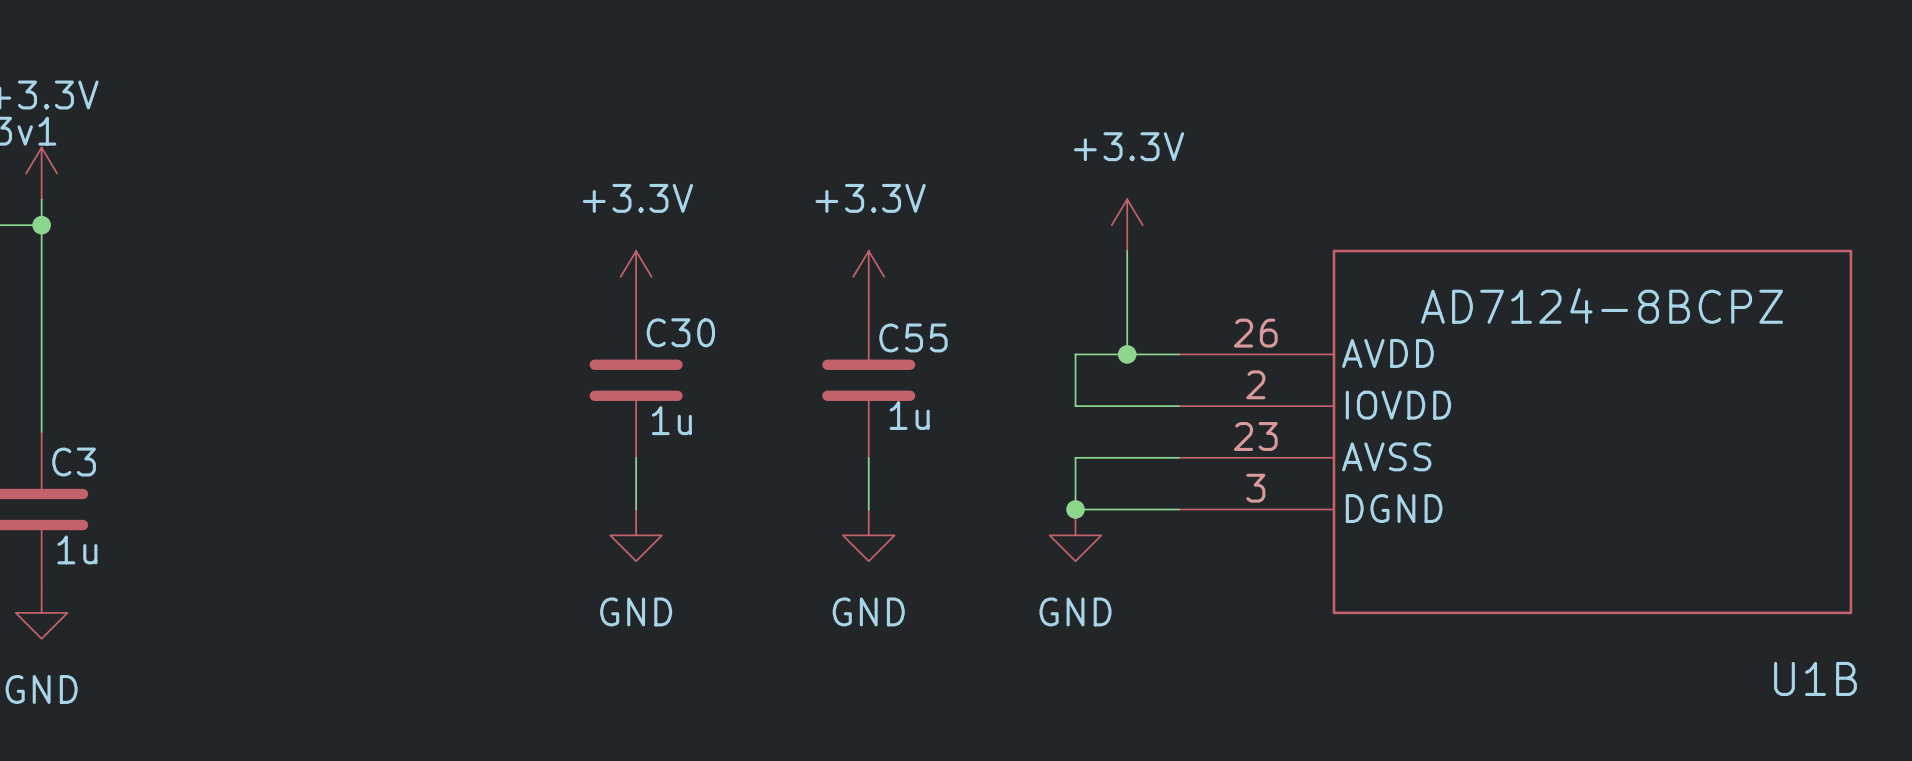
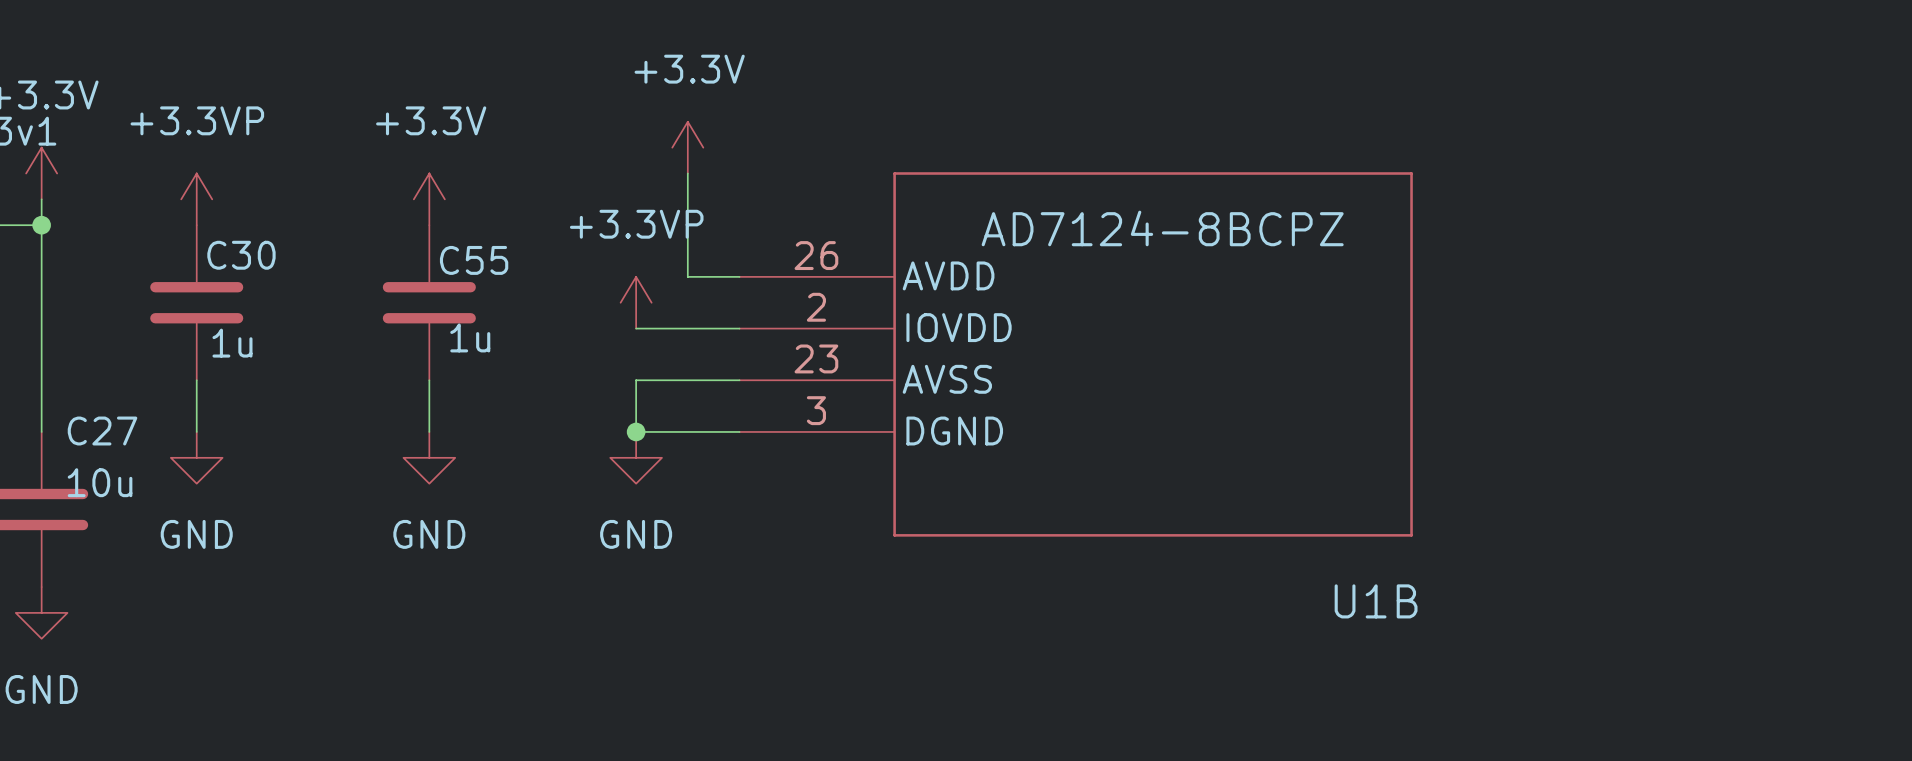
power symbol: none -> +3.3V (687, 147)
wire: none -> (687, 173) (687, 276) (739, 276)
power symbol: none -> +3.3VP (196, 199)
power symbol: none -> +3.3V (429, 199)
power symbol: +3.3V (1127, 225) -> none
wire: (1127, 251) (1127, 354) -> none
power symbol: +3.3V (636, 276) -> none
power symbol: +3.3V (868, 276) -> none
power symbol: none -> +3.3VP (636, 302)
wire: none -> (636, 328) (739, 328)
junction: (1127, 354) -> none
wire: (1178, 354) (1075, 354) (1075, 406) (1178, 406) -> none
C30 position: (636, 380) -> (196, 302)
C55 position: (868, 380) -> (429, 302)
junction: none -> (636, 431)
U1B position: (1515, 431) -> (1076, 354)
power symbol: none -> GND (196, 457)
power symbol: none -> GND (429, 457)
wire: (636, 457) (636, 509) -> (196, 380) (196, 431)
wire: (868, 457) (868, 509) -> (429, 380) (429, 431)
wire: (1178, 457) (1075, 457) (1075, 509) (1178, 509) -> (739, 380) (636, 380) (636, 431) (739, 431)
C3 name: C3 (74, 462) -> C27 (102, 431)
junction: (1075, 509) -> none
power symbol position: GND (636, 535) -> GND (636, 457)
power symbol: GND (868, 535) -> none
power symbol: GND (1075, 535) -> none
C3 value: 1u (77, 549) -> 10u (100, 482)

